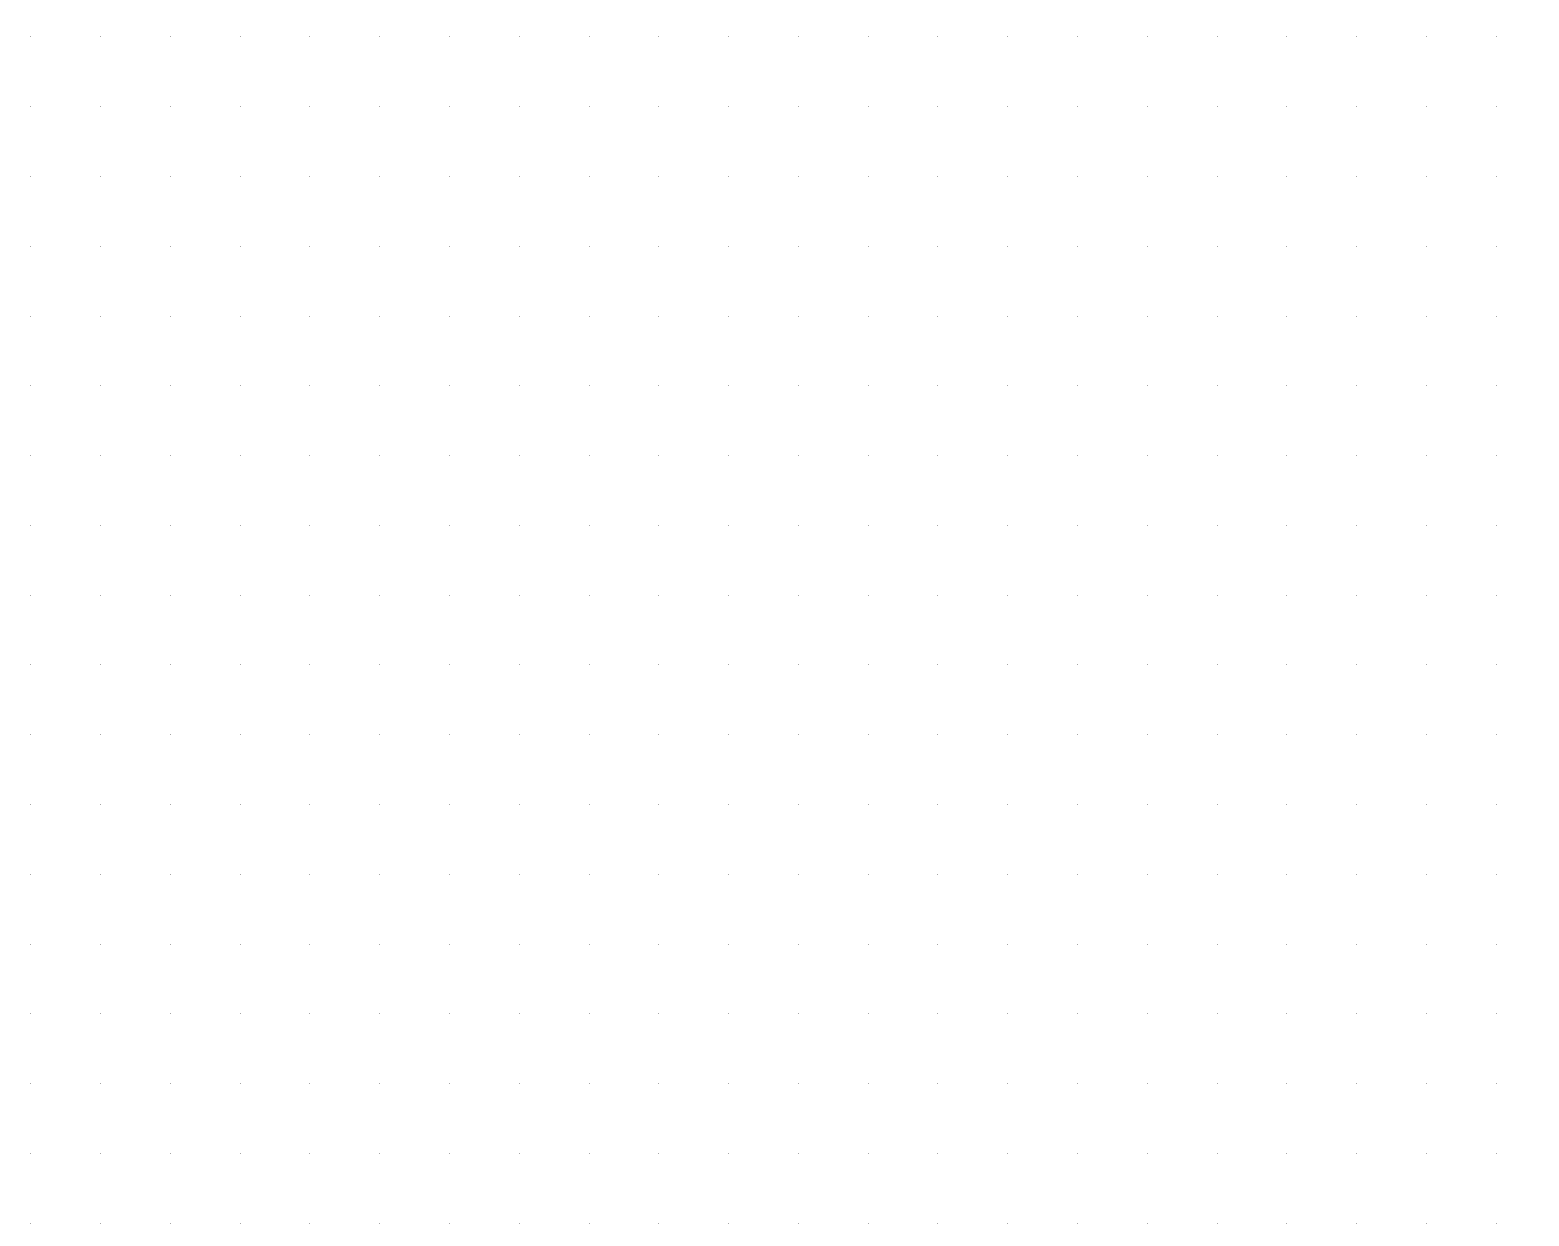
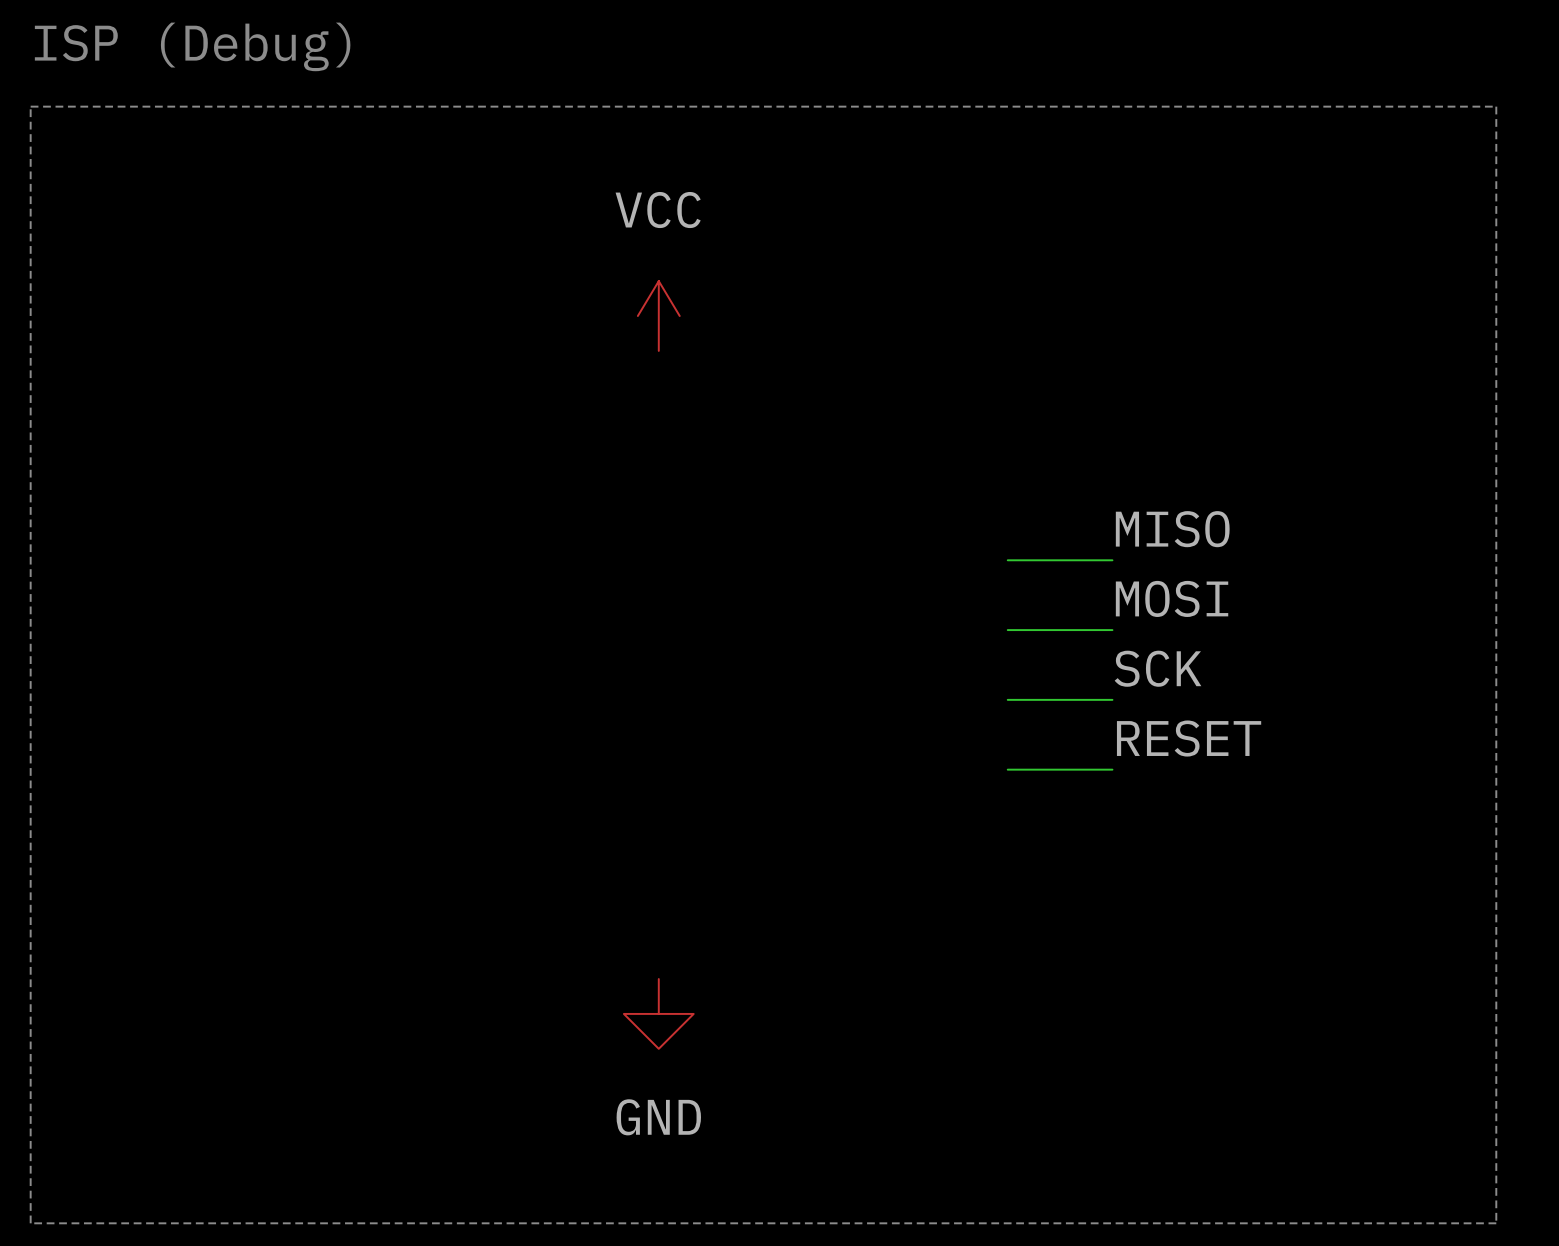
text: none -> ISP (Debug) (192, 46)
line: none -> (30, 106) (1496, 106) (1496, 1223) (30, 1223) (30, 106)
power symbol: none -> VCC (658, 316)
label: none -> MISO (1172, 529)
wire: none -> (1007, 560) (1112, 560)
label: none -> MOSI (1172, 598)
wire: none -> (1007, 630) (1112, 630)
label: none -> SCK (1158, 668)
wire: none -> (1007, 699) (1112, 699)
label: none -> RESET (1189, 738)
wire: none -> (1007, 769) (1112, 769)
power symbol: none -> GND (658, 1013)

